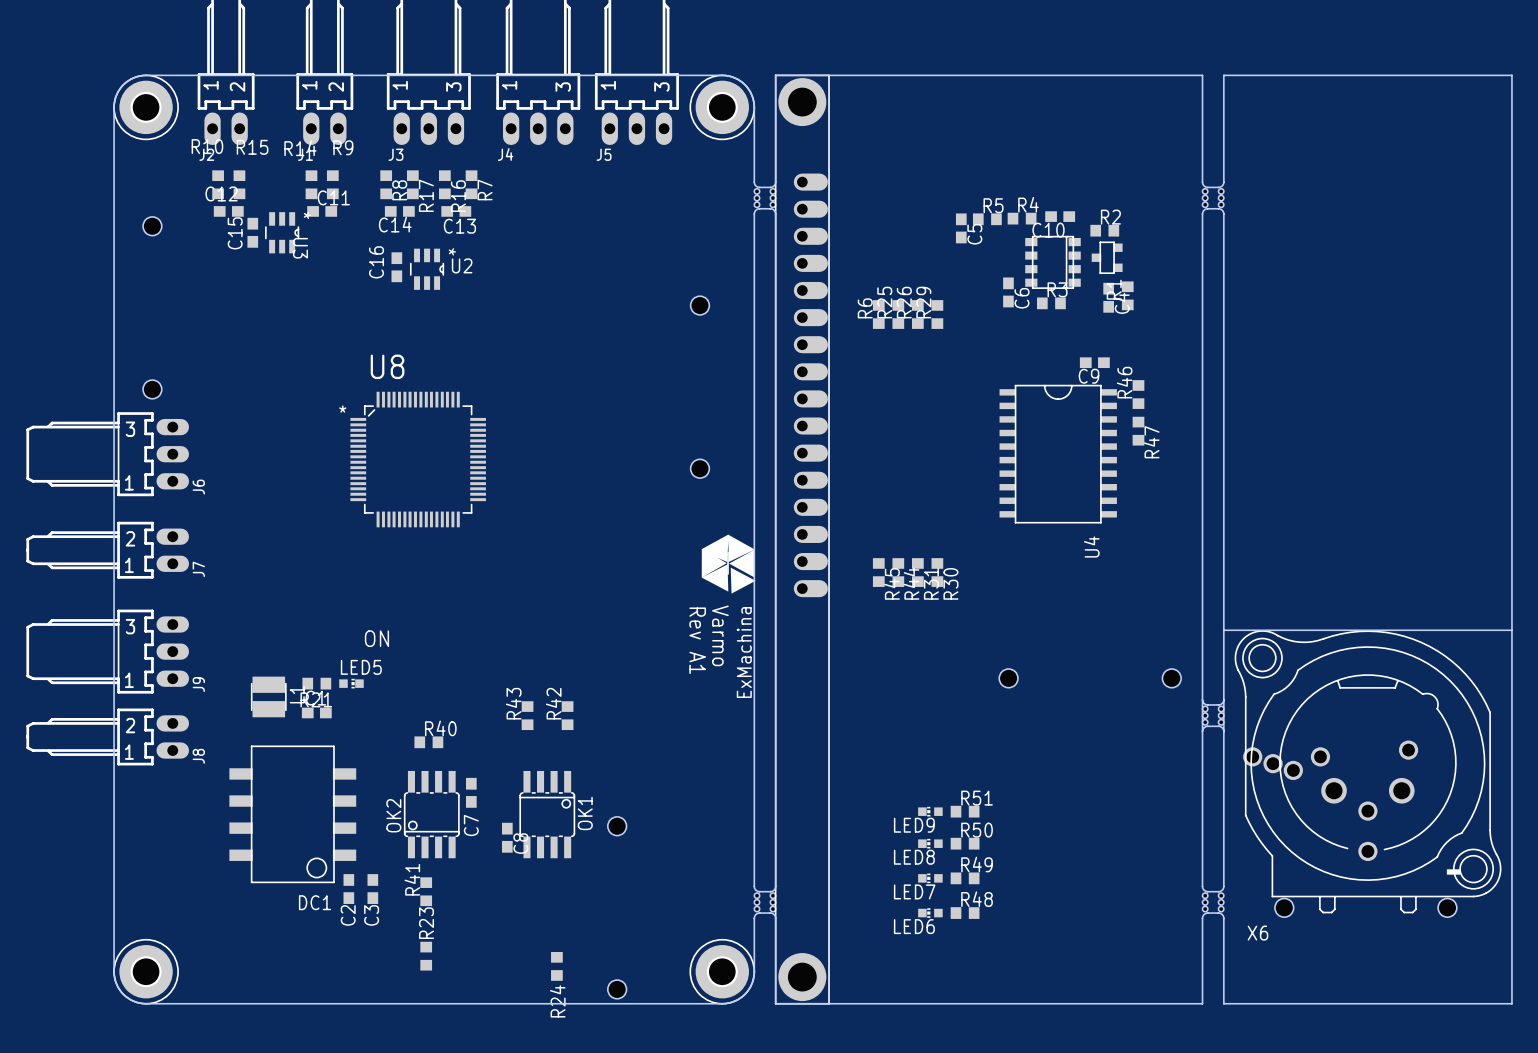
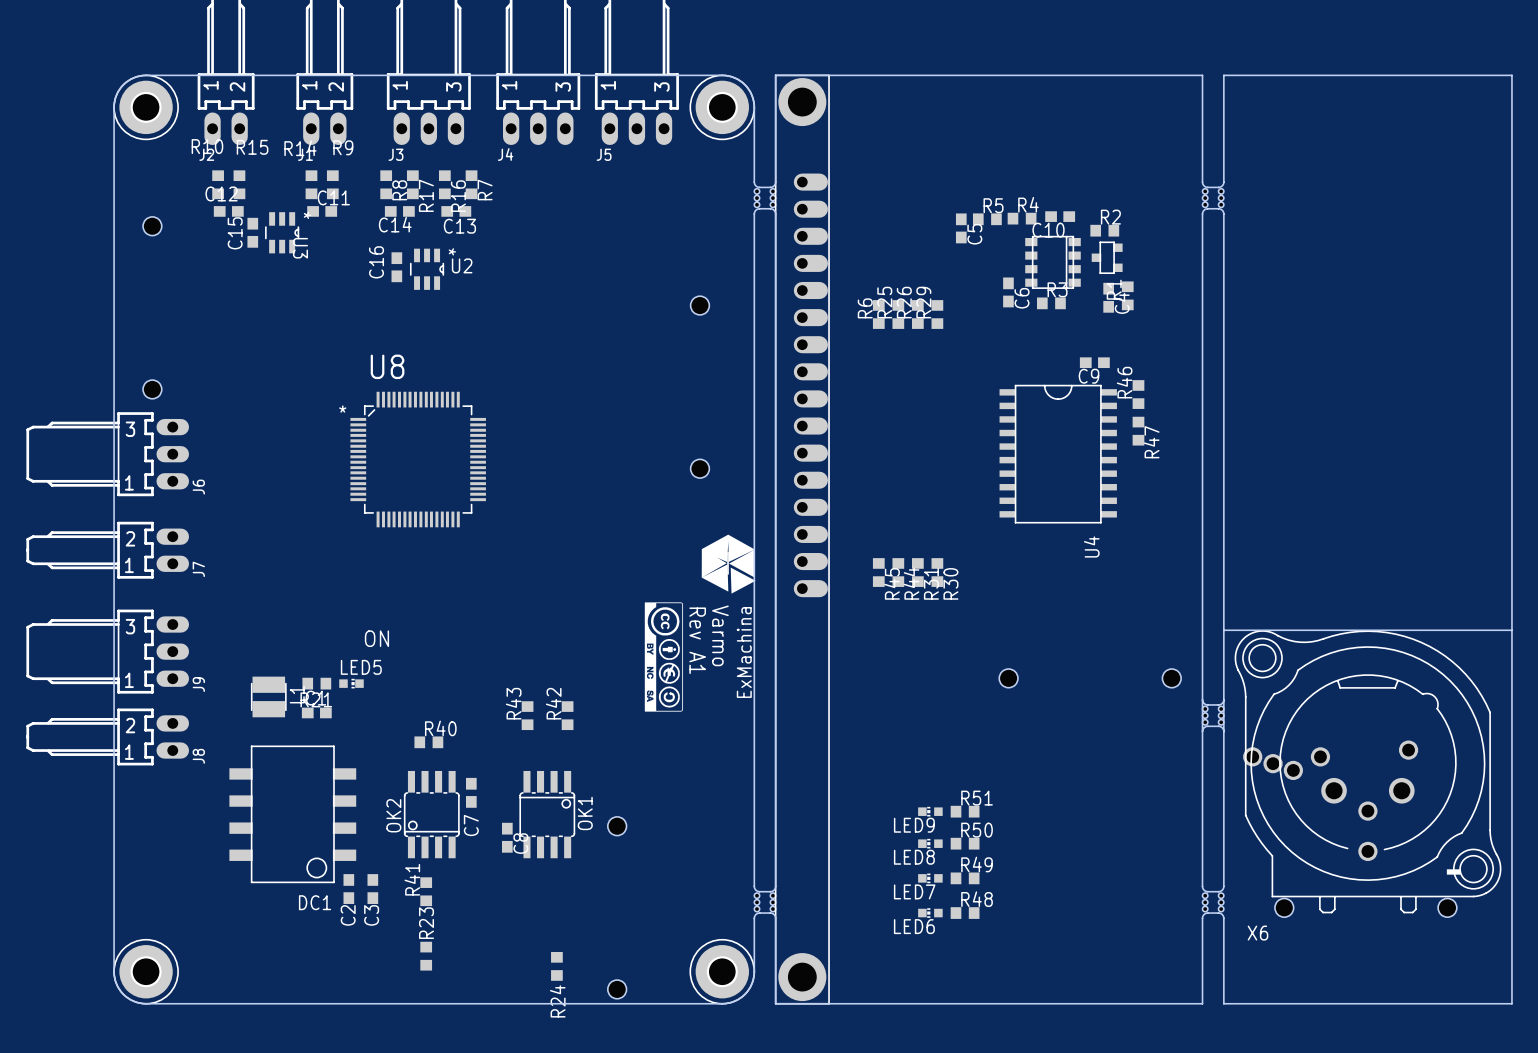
drawing: none -> [644, 602, 684, 712]

